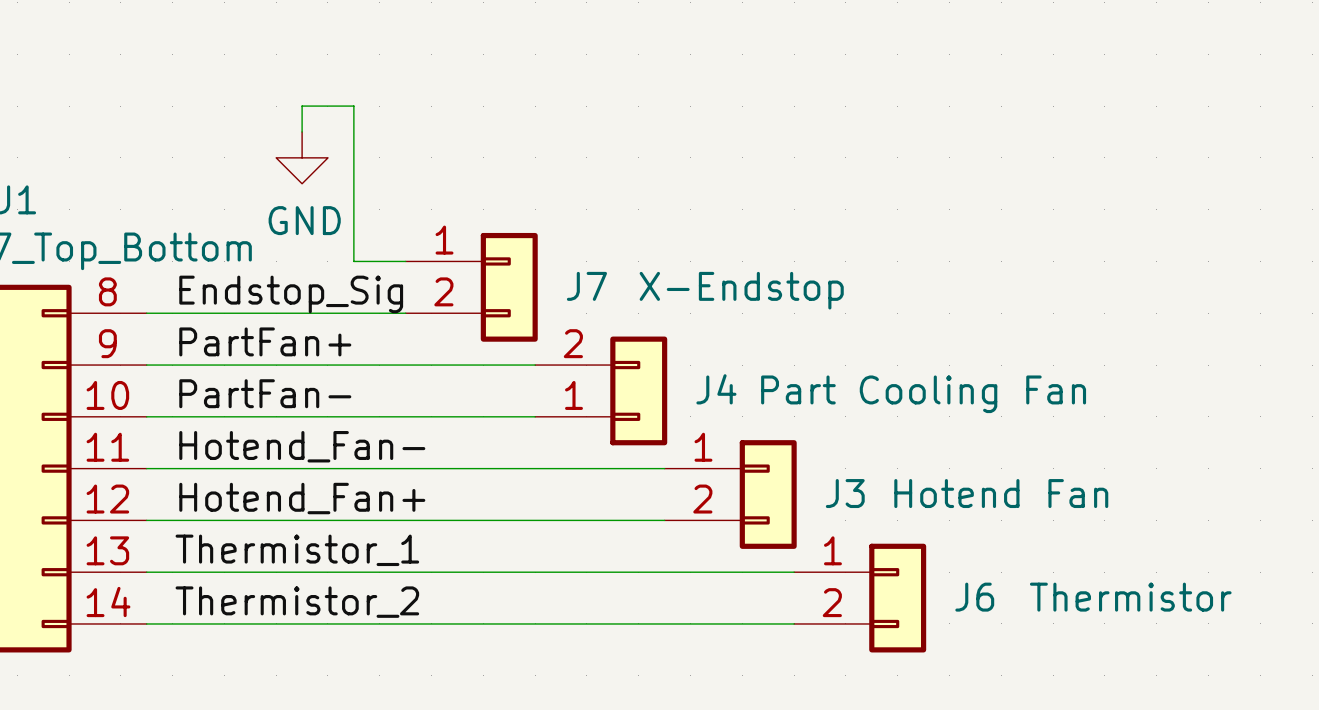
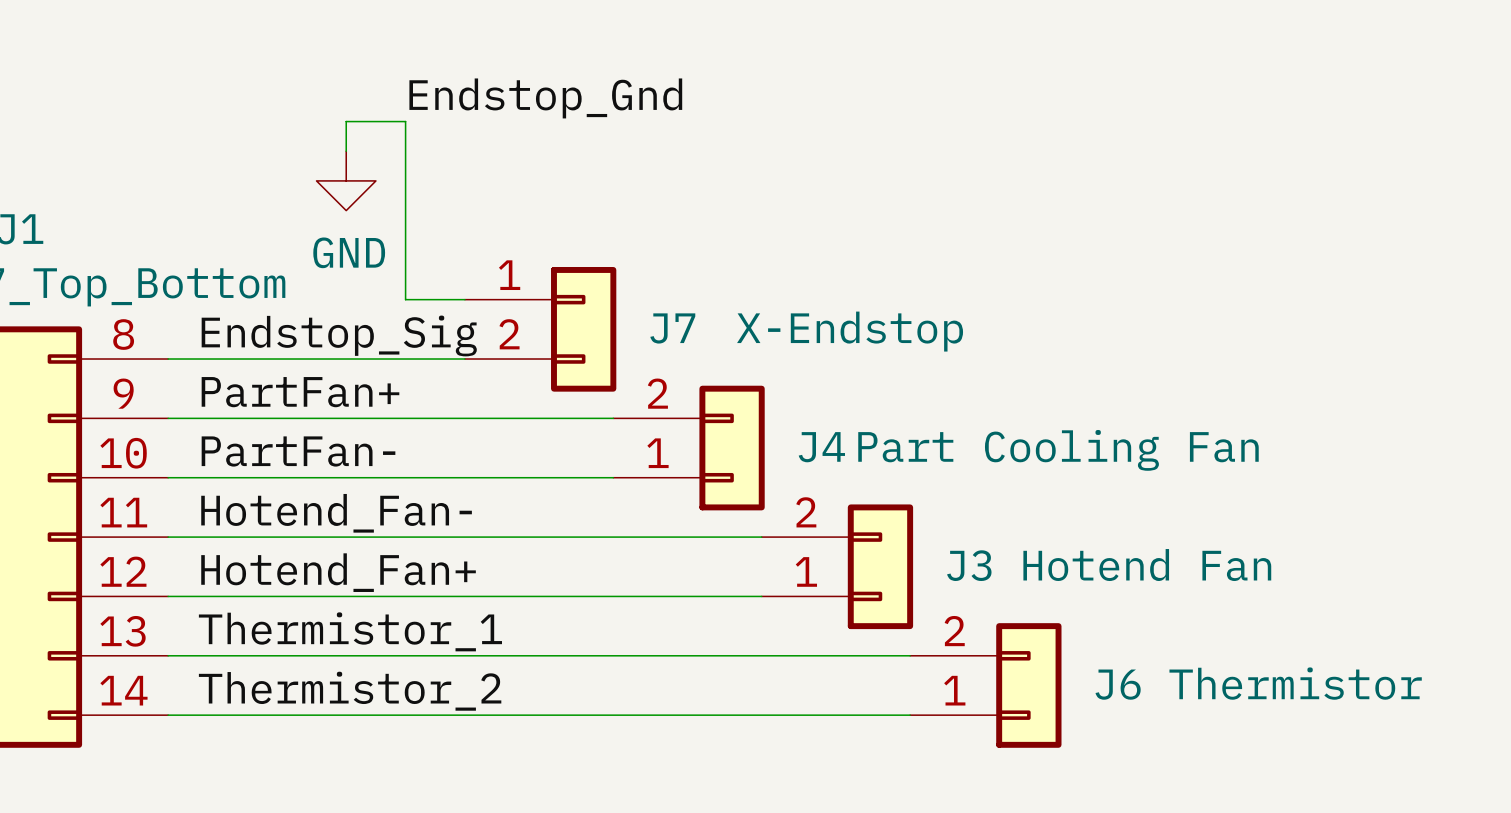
label: none -> Endstop_Gnd (545, 98)
J3 flip: as is (768, 494) -> up-down (880, 566)
J6 flip: as is (897, 598) -> up-down (1028, 685)

